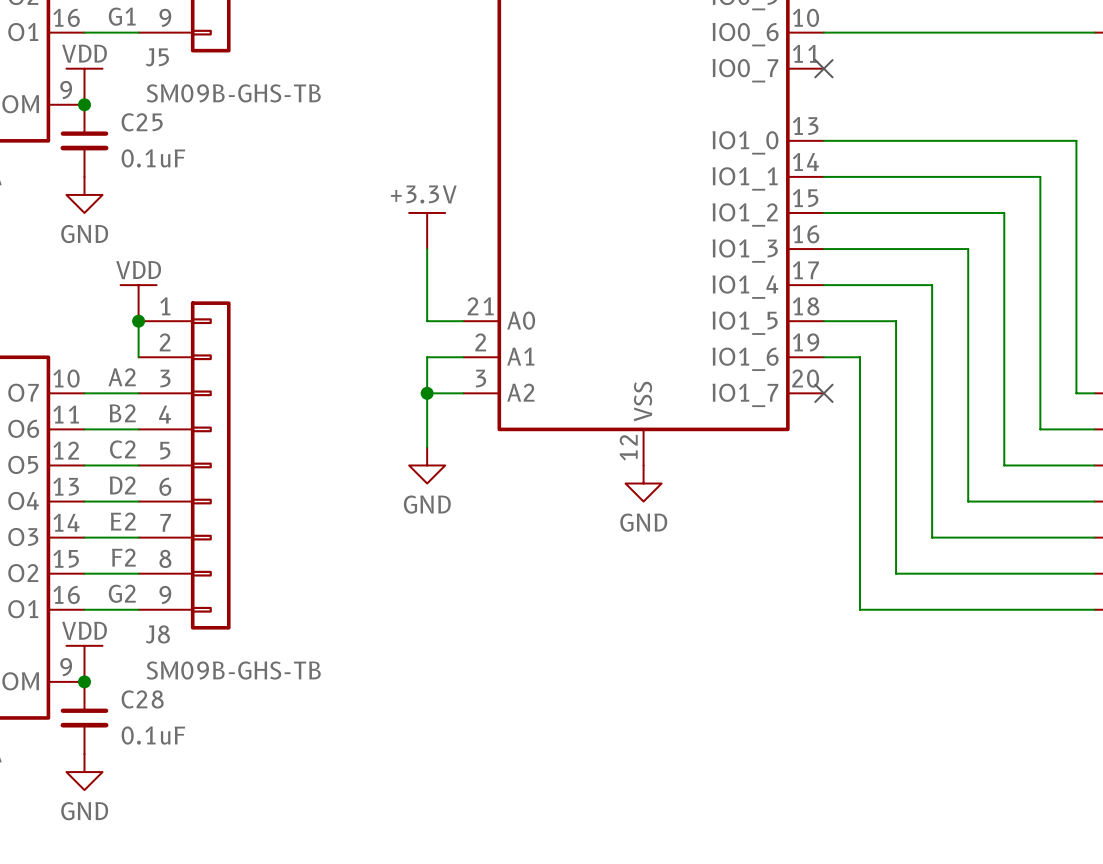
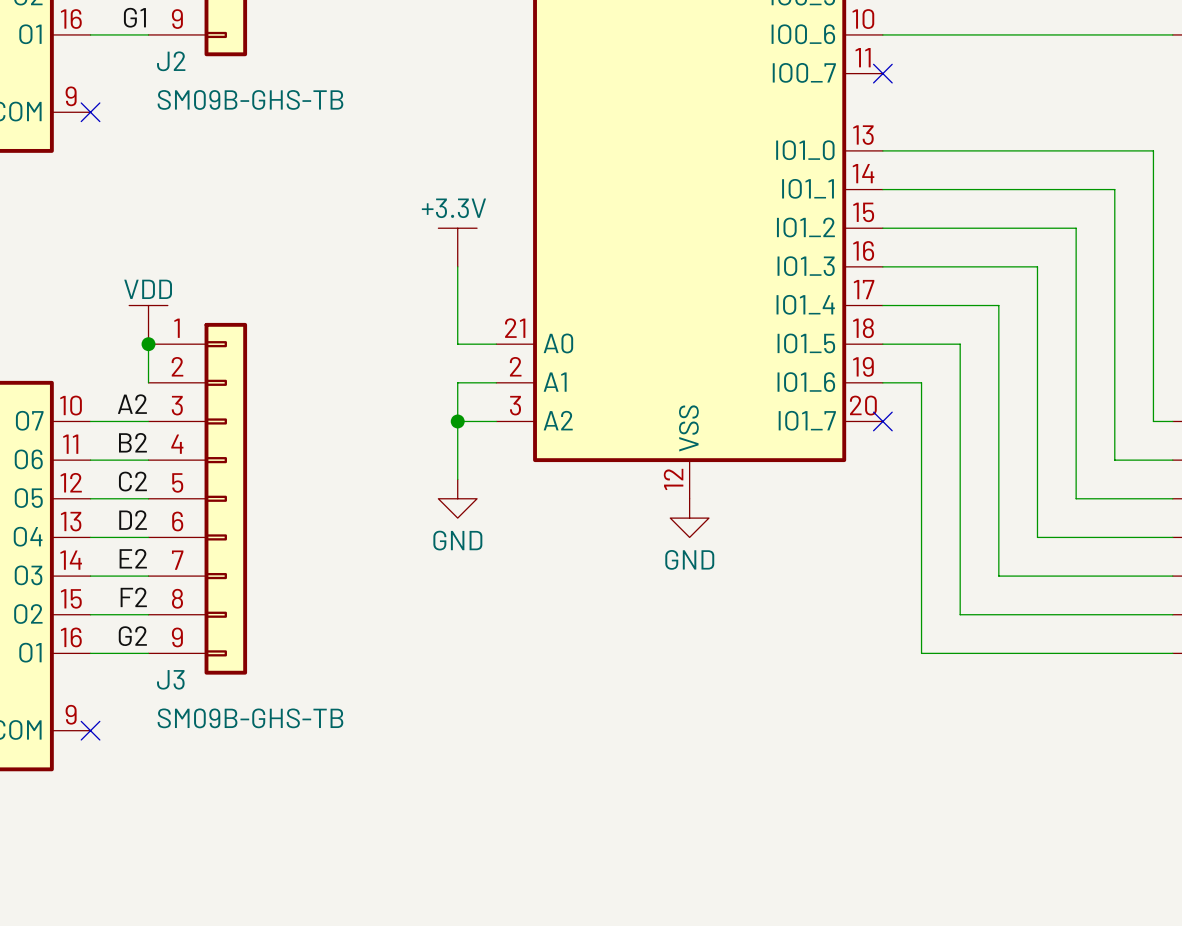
J5 name: J5 (157, 57) -> J2 (171, 61)
power symbol: VDD (84, 86) -> none
junction: (84, 104) -> none
no-connect mark: none -> (90, 112)
C25: 0.1uF (84, 140) -> none
power symbol: GND (84, 194) -> none
J8 name: J8 (157, 634) -> J3 (170, 679)
power symbol: VDD (84, 663) -> none
junction: (84, 681) -> none
no-connect mark: none -> (90, 730)
C28: 0.1uF (84, 717) -> none
power symbol: GND (84, 772) -> none

